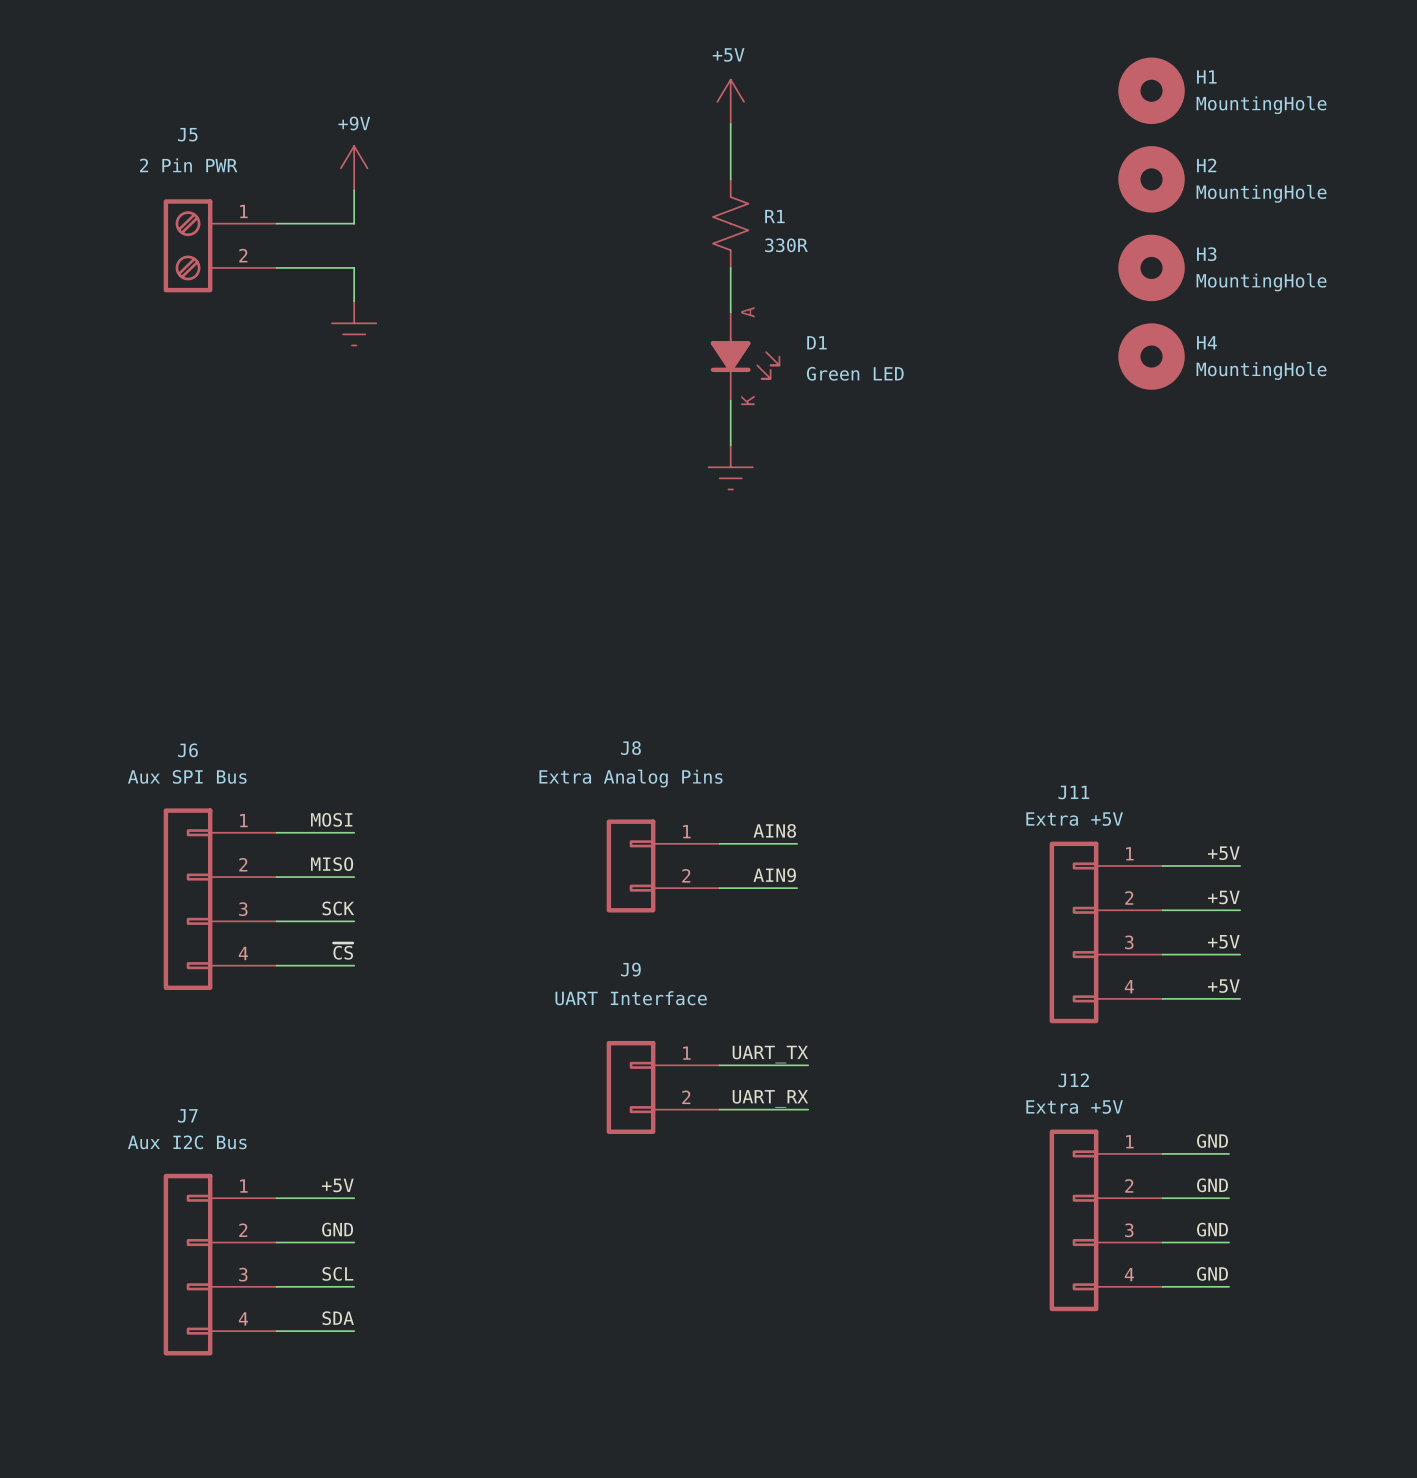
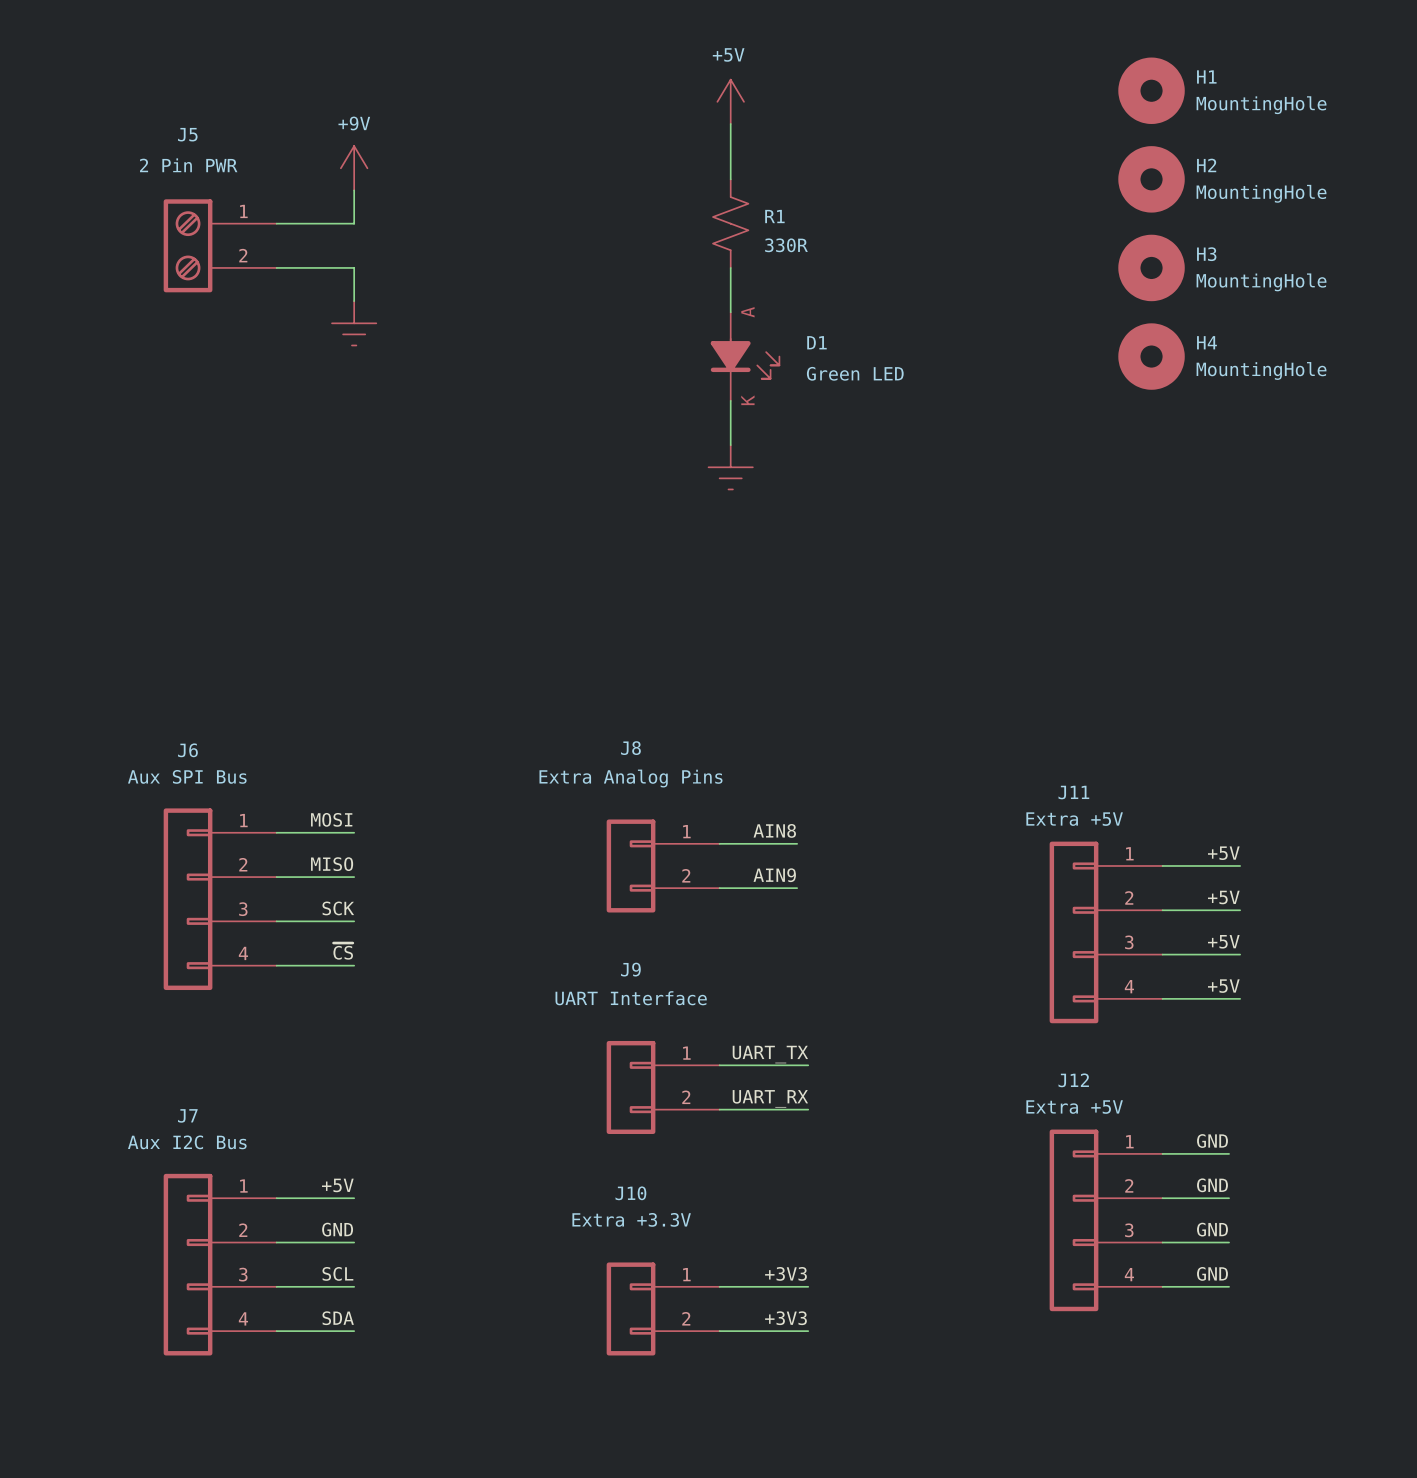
label: none -> +3V3 (785, 1273)
wire: none -> (719, 1286) (808, 1286)
J10: none -> Extra +3.3V (663, 1308)
label: none -> +3V3 (785, 1318)
wire: none -> (719, 1331) (808, 1331)

